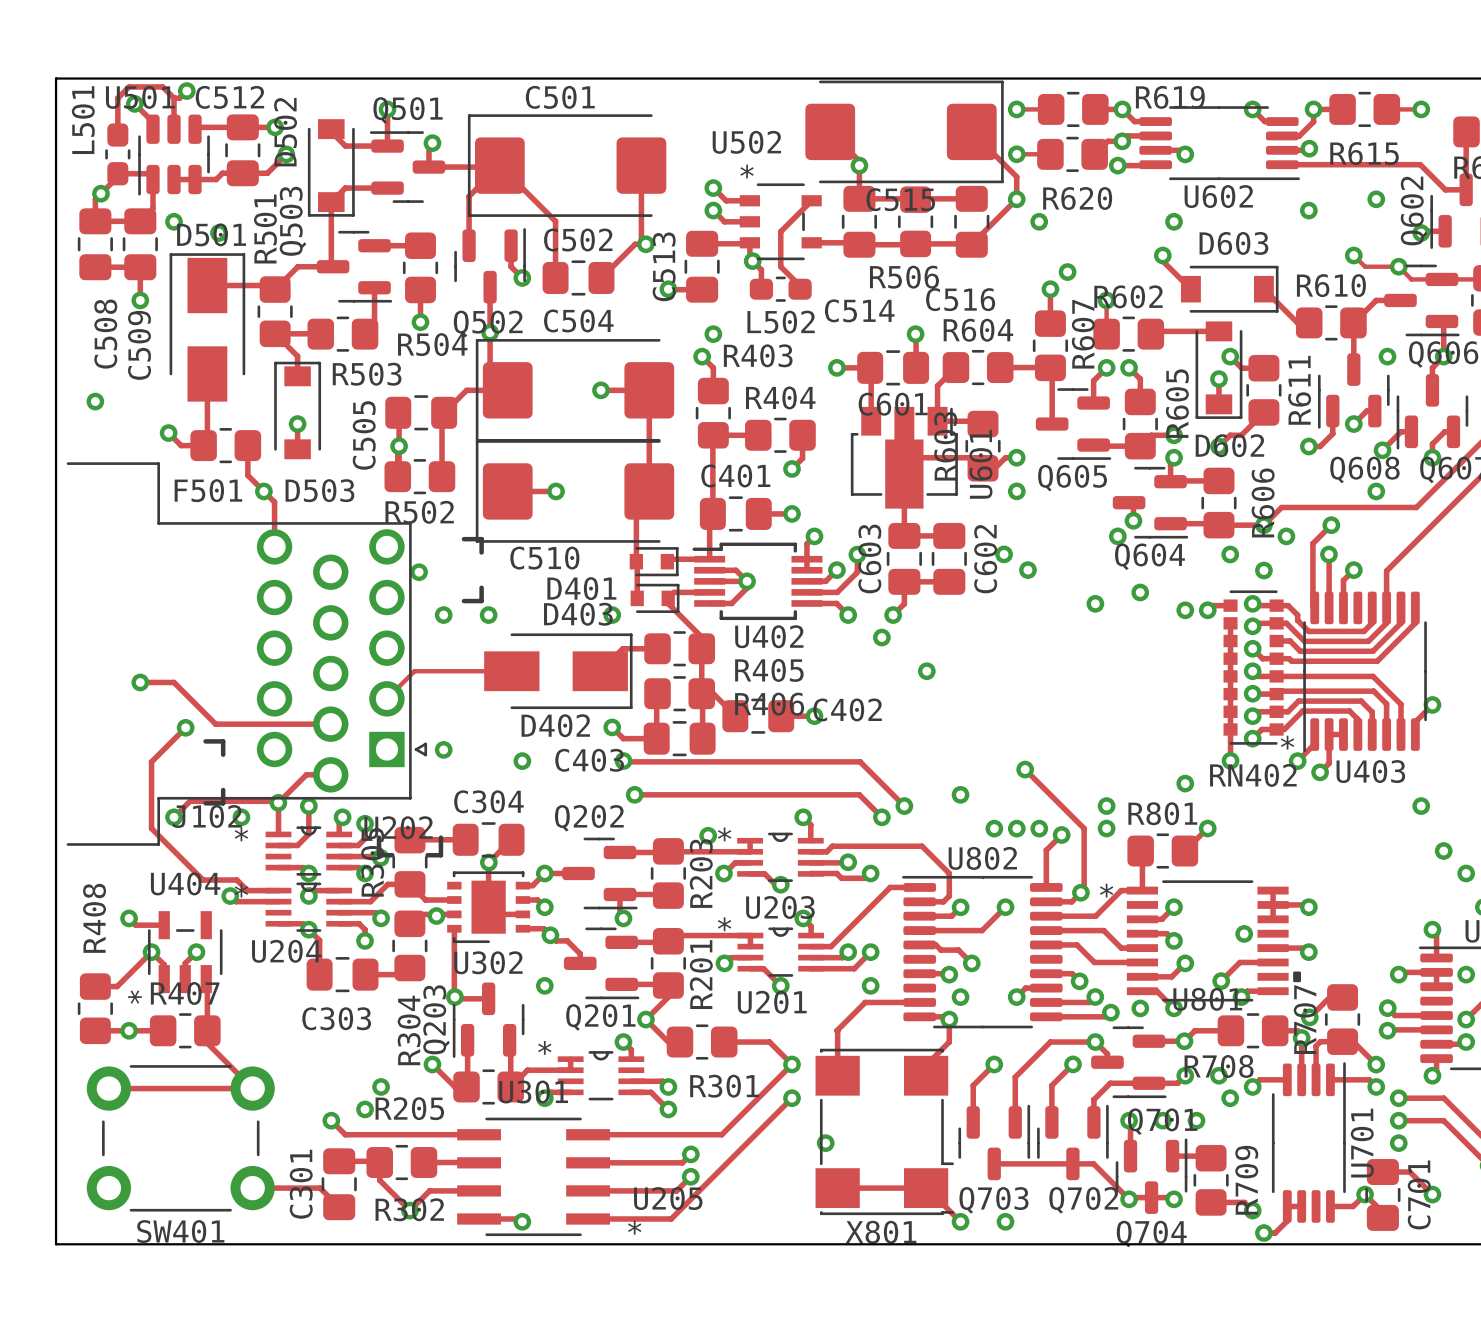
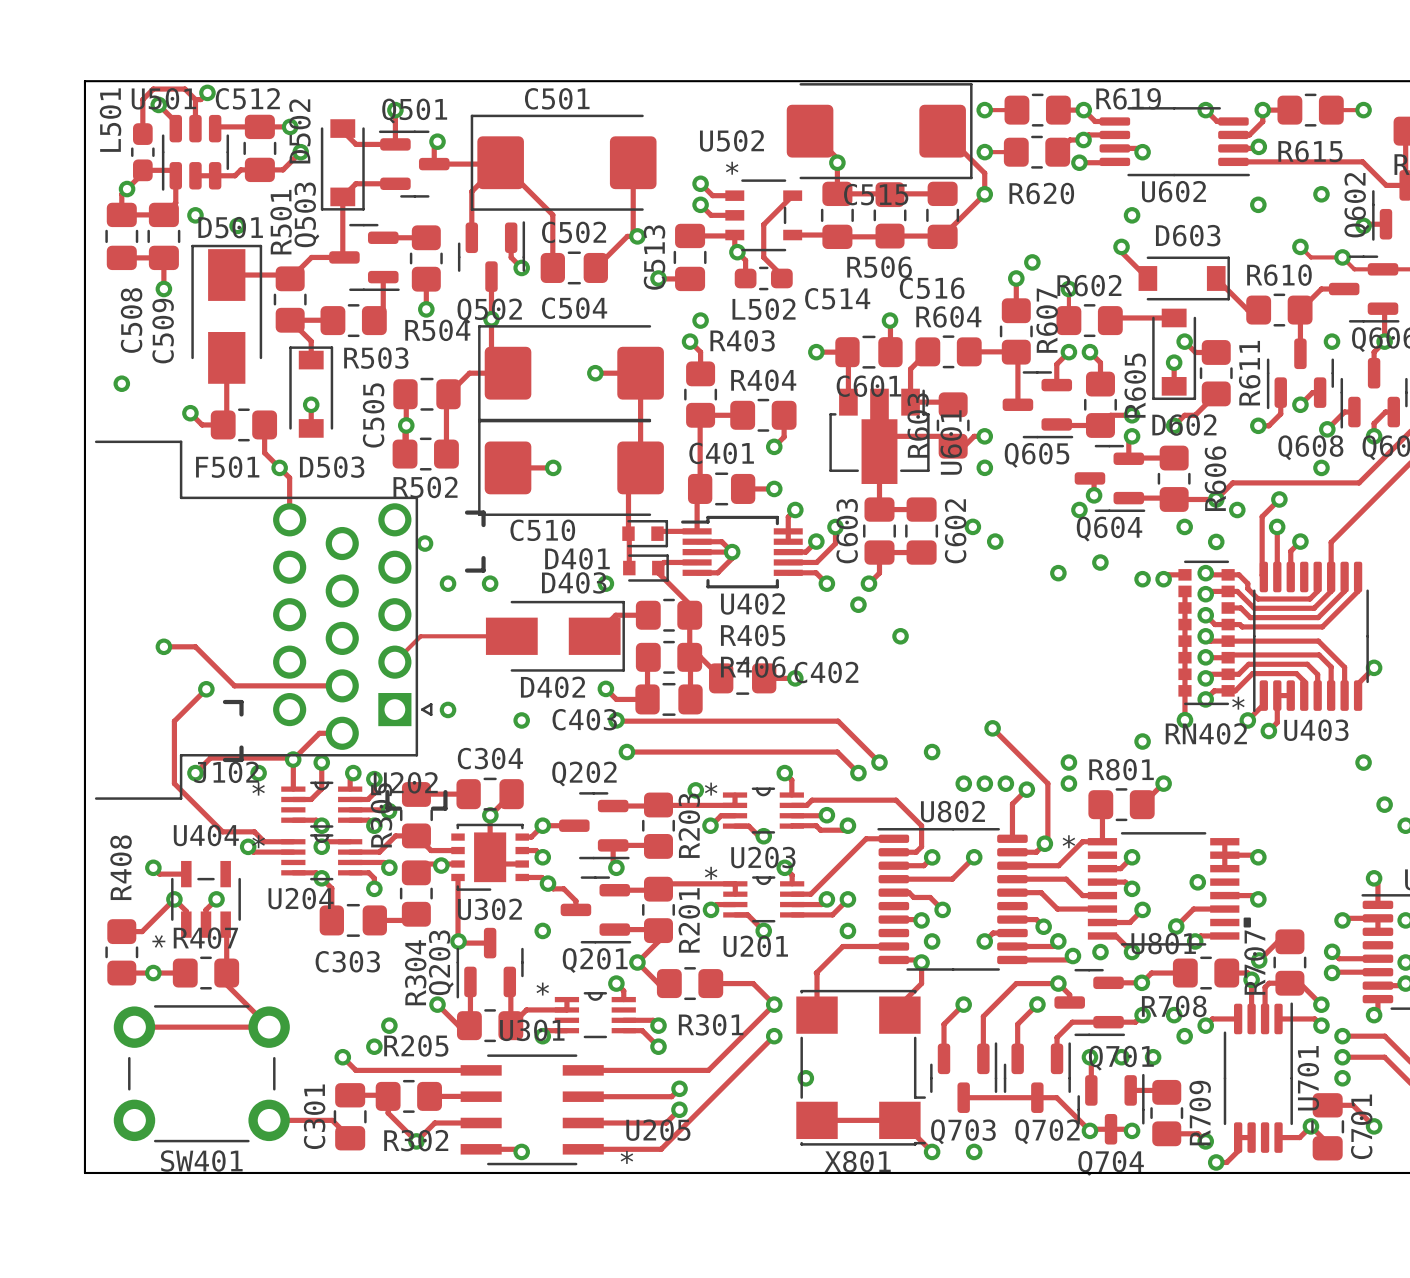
via: (1039, 221) -> none

